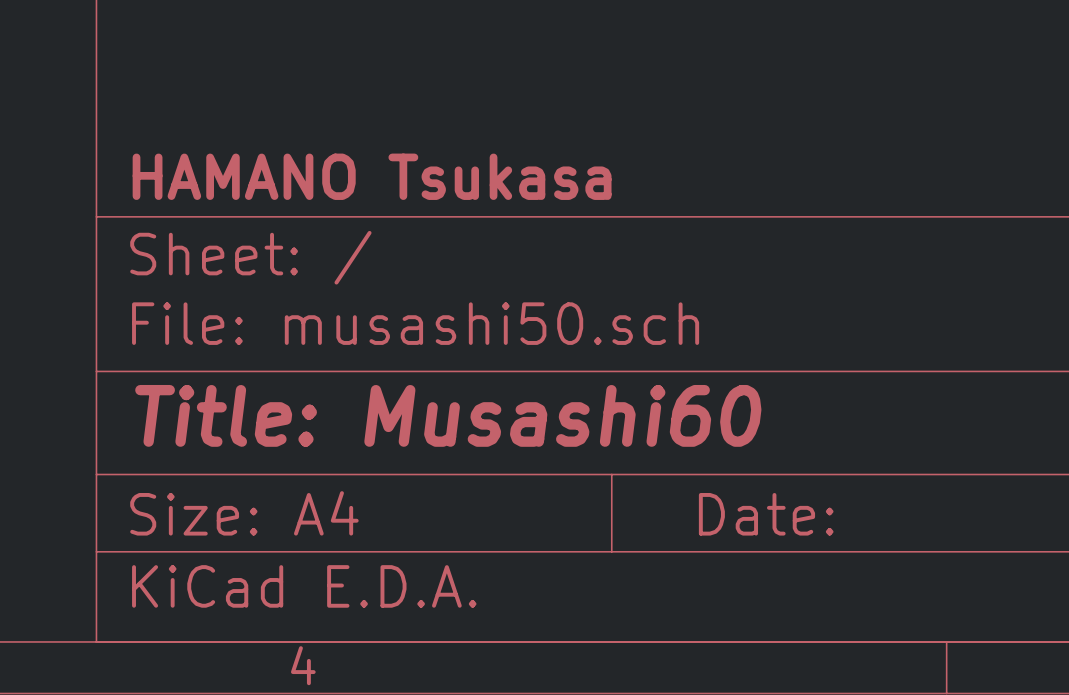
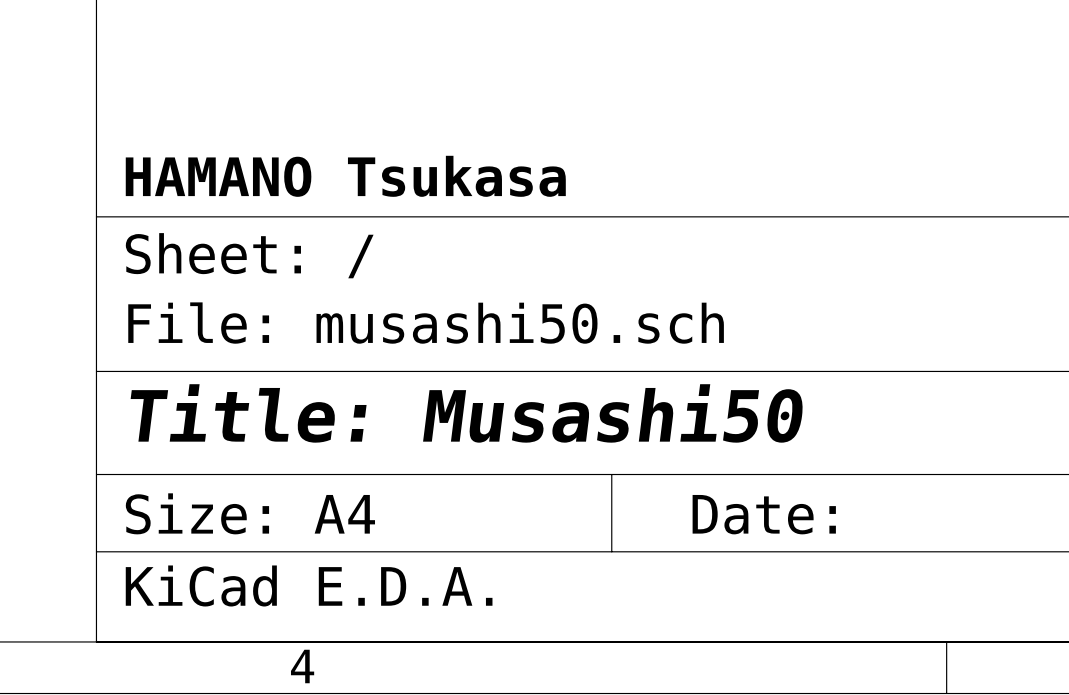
title block: Title: Musashi60 (448, 415) -> Title: Musashi50 (467, 413)

